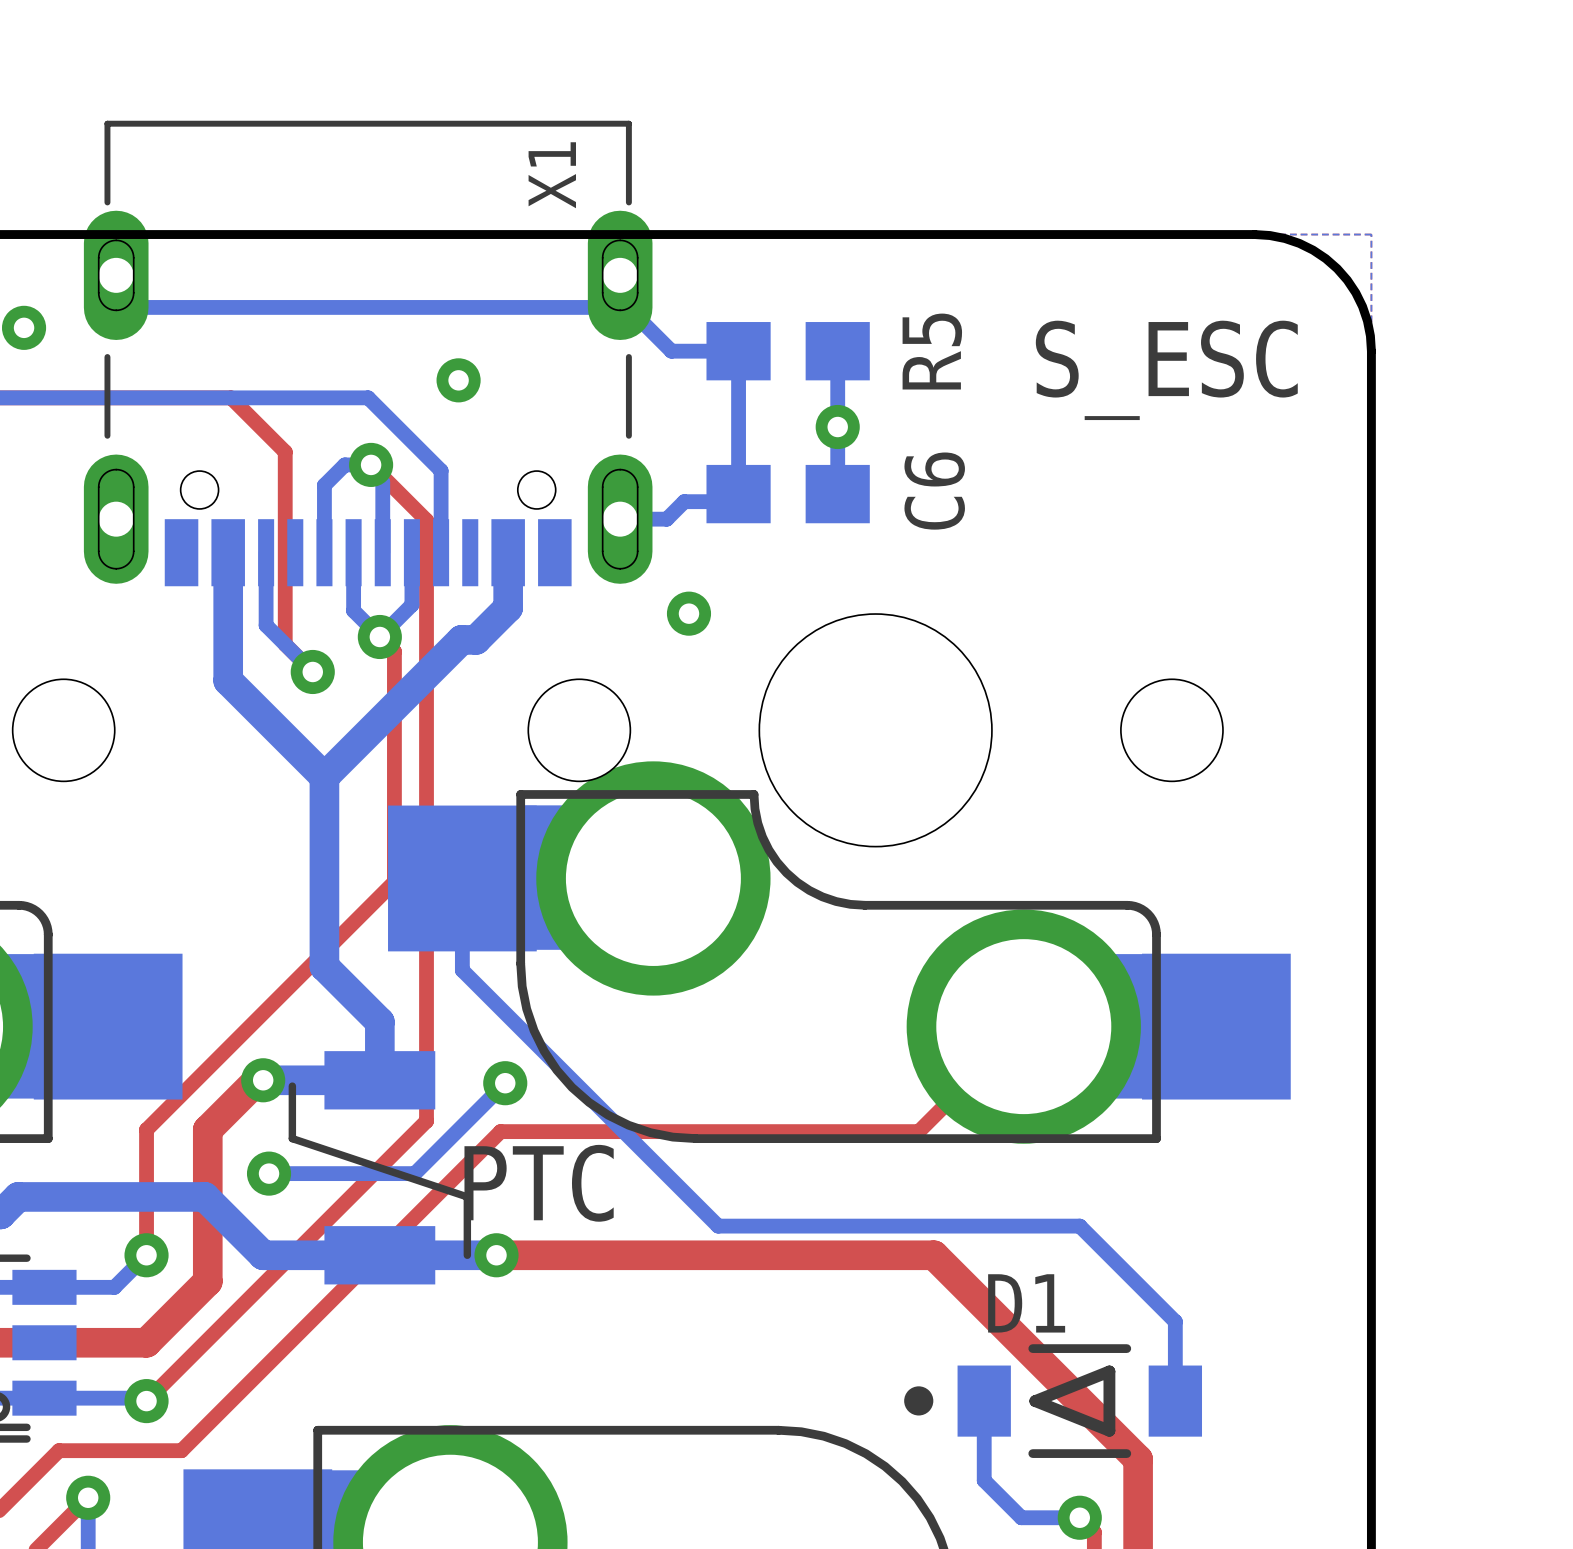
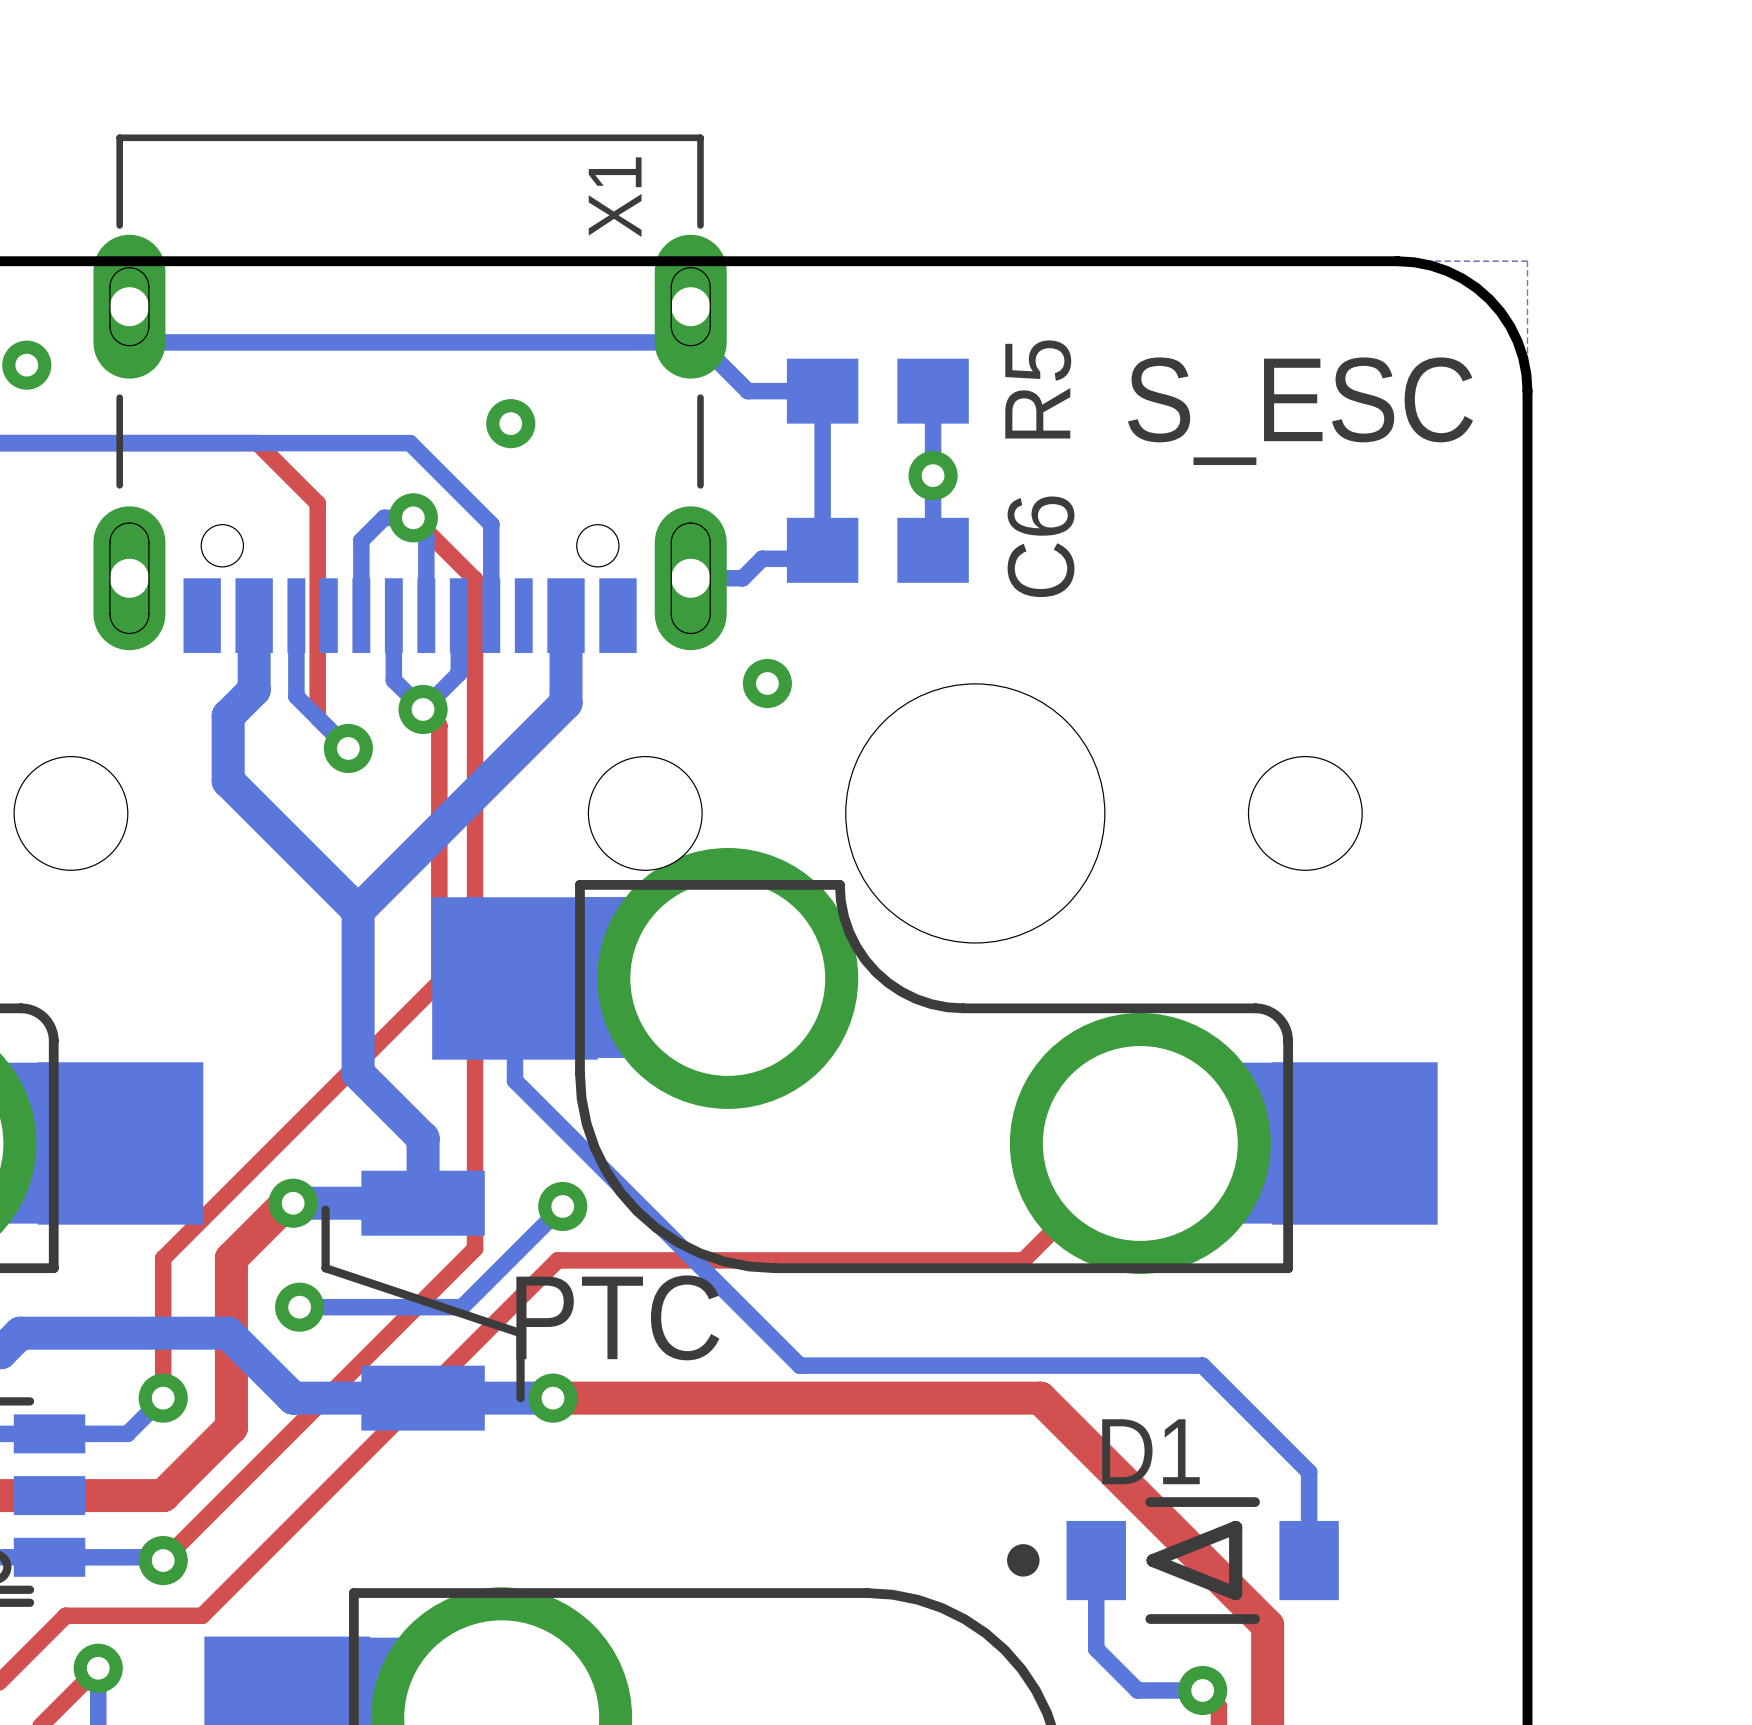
bottom track: (508, 607) (476, 639) (461, 639) (324, 776) -> (566, 677) (566, 702) (358, 910)
bottom track: (228, 619) (228, 680) (324, 776) -> (254, 690) (228, 715) (228, 780) (358, 910)
bottom track: (324, 776) (324, 966) -> (358, 910) (358, 1073) (361, 1076)

